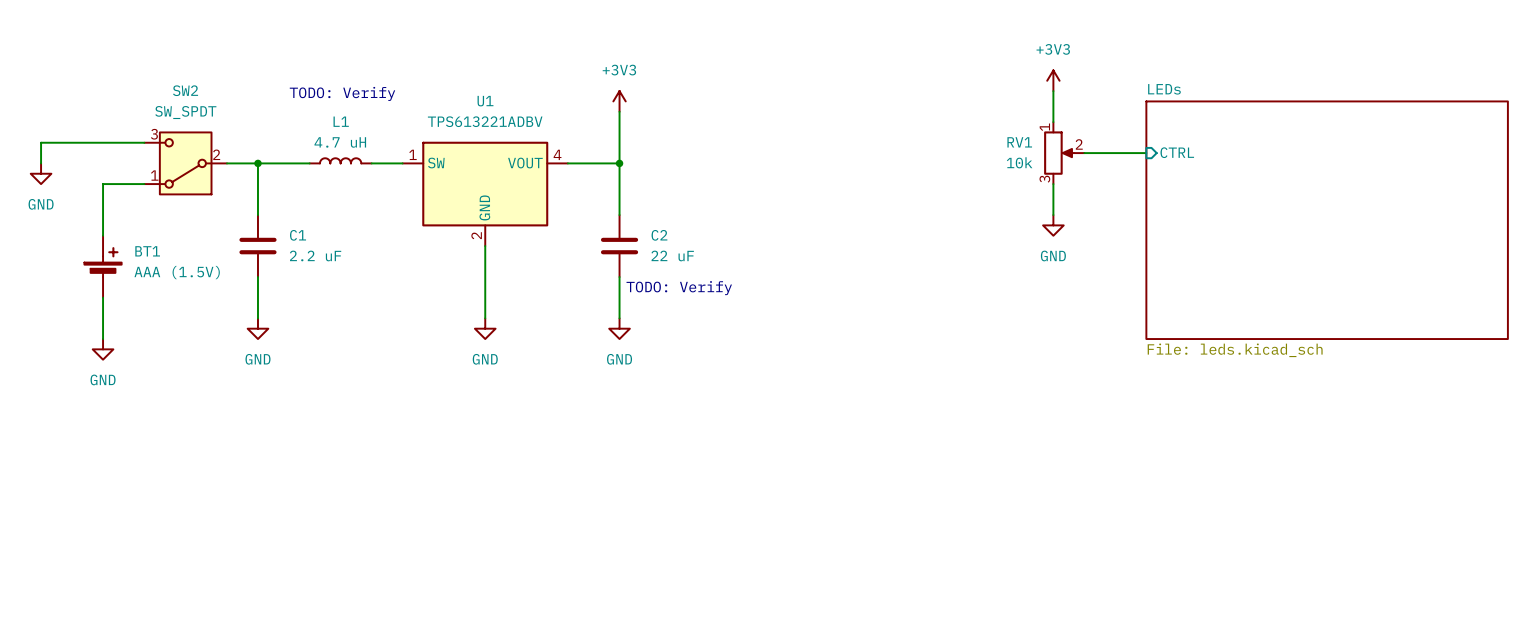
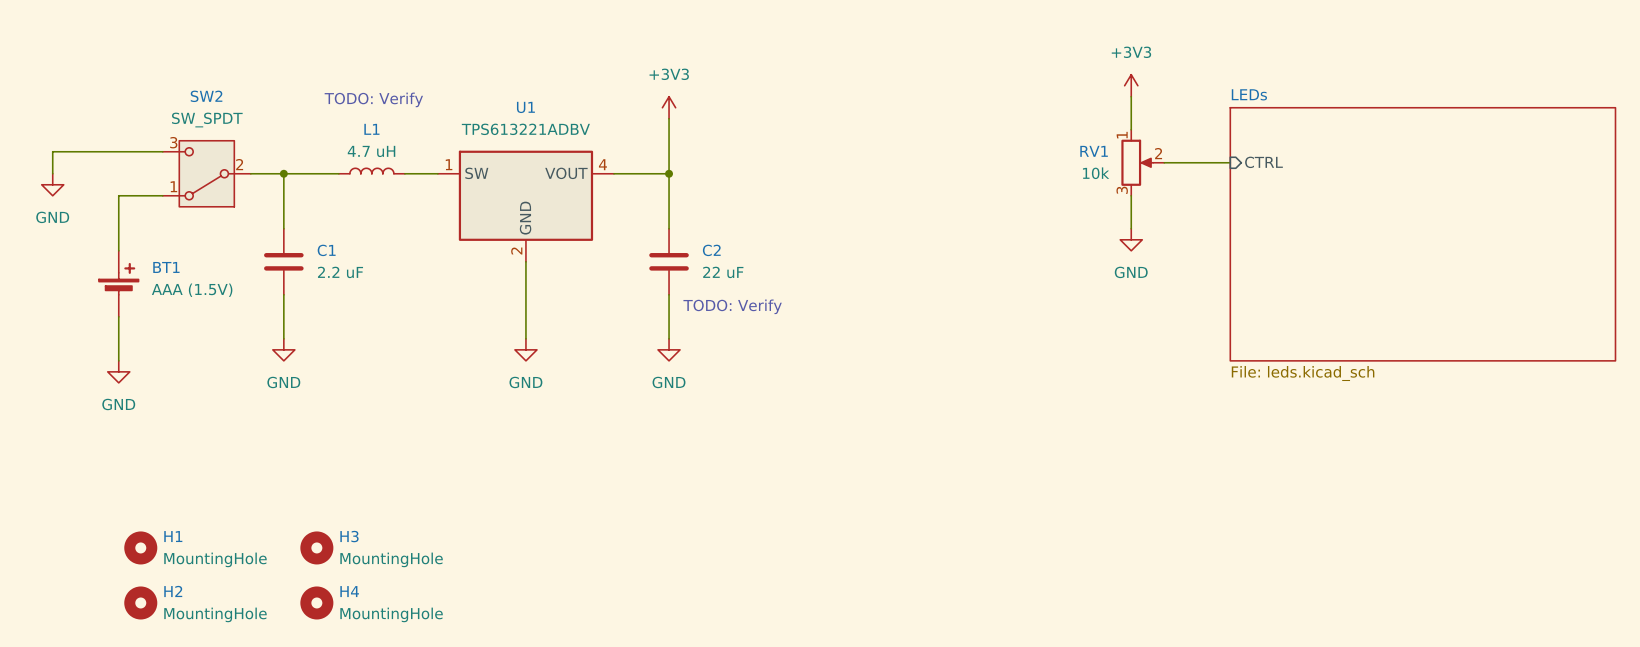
H1: none -> MountingHole (140, 547)
H3: none -> MountingHole (316, 547)
H2: none -> MountingHole (140, 602)
H4: none -> MountingHole (316, 602)

